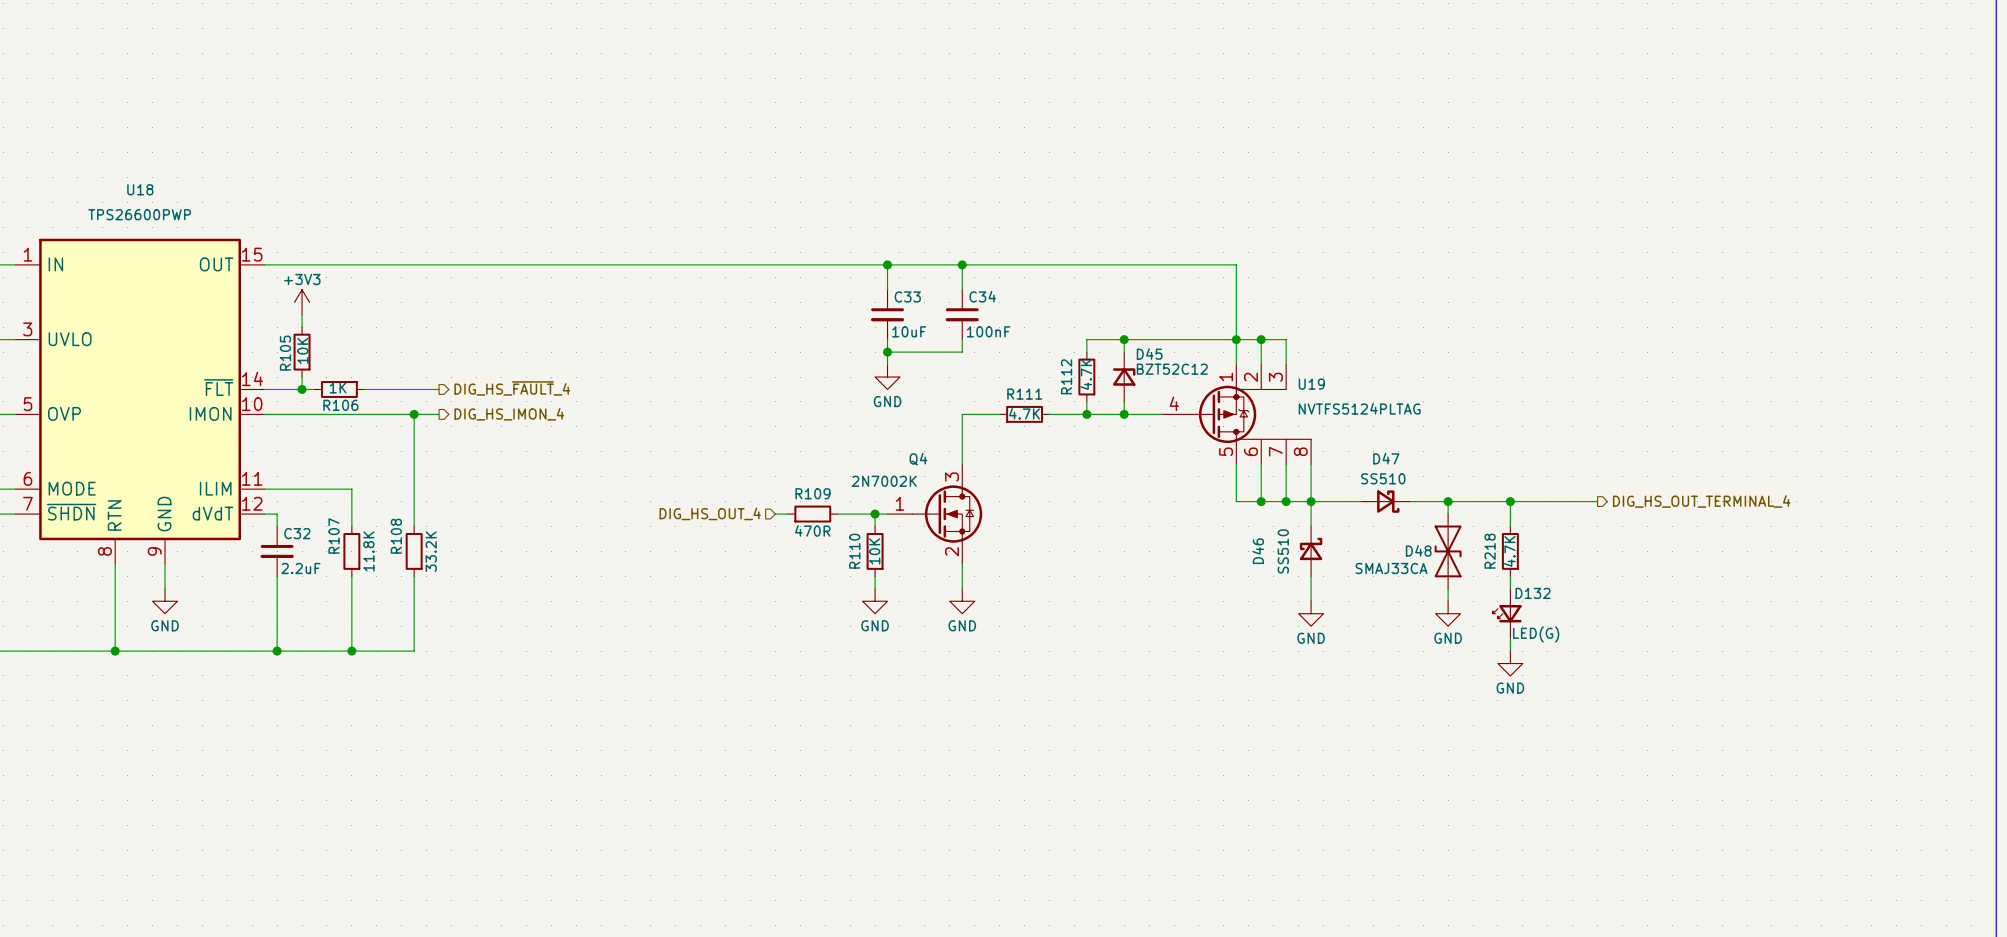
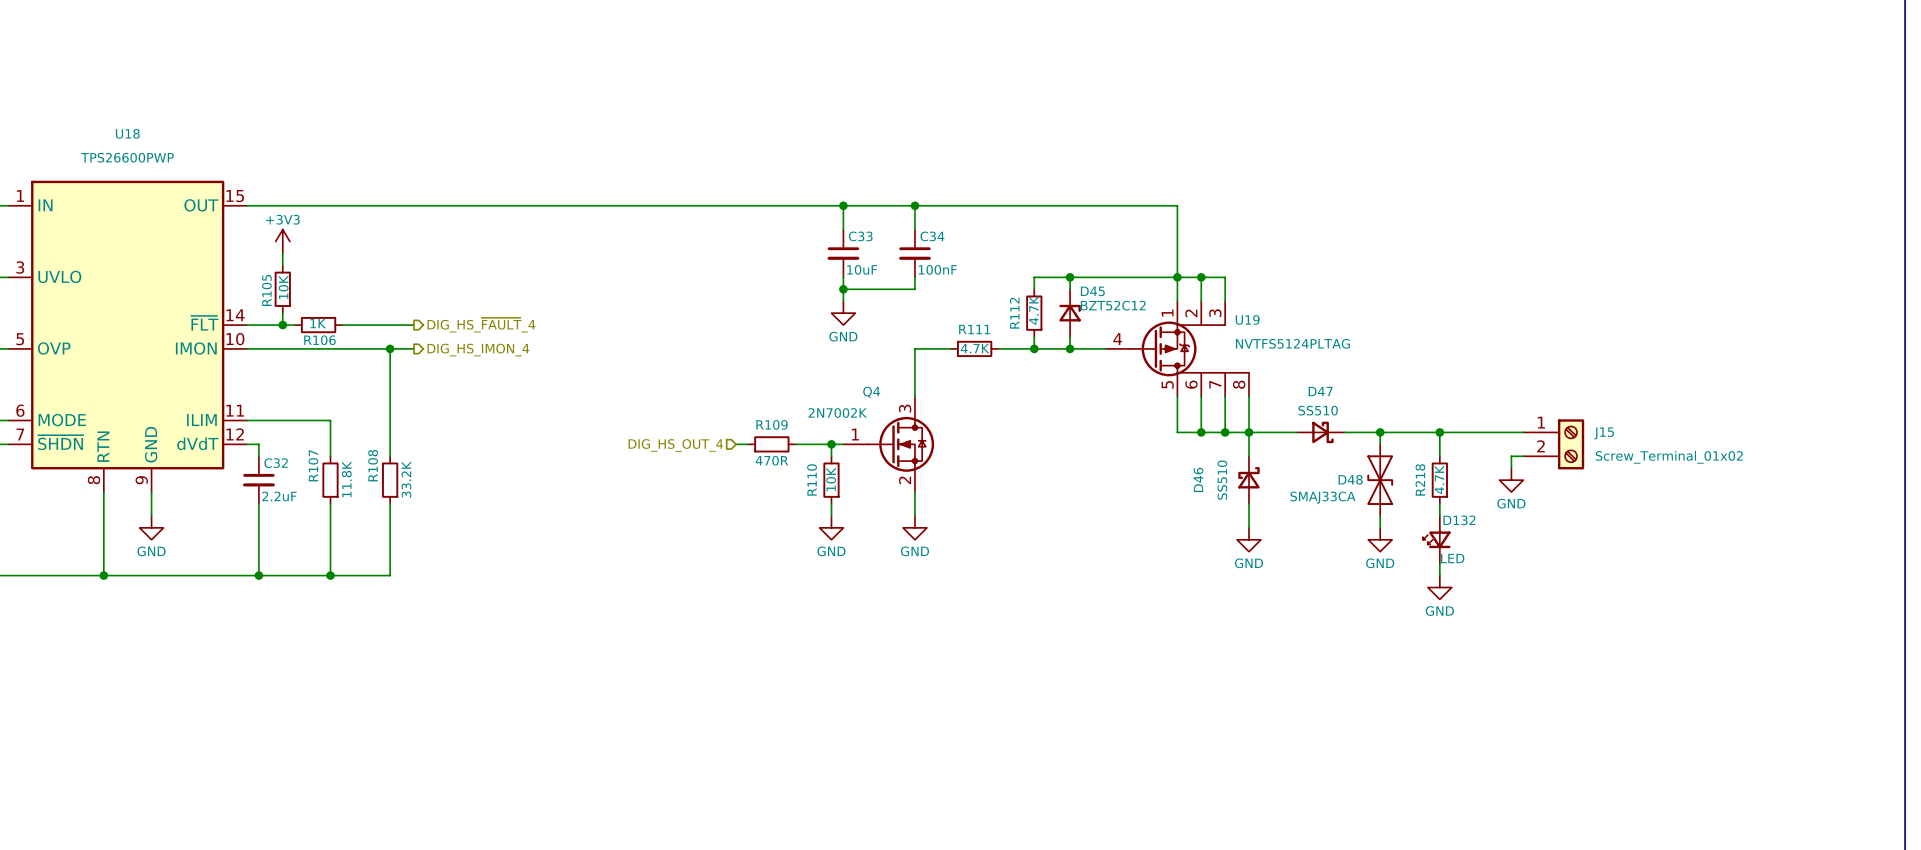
hierarchical label: DIG_HS_OUT_TERMINAL_4 (1701, 501) -> none
J15: none -> Screw_Terminal_01x02 (1553, 444)
wire: none -> (1523, 456) (1511, 456) (1511, 468)
power symbol: none -> GND (1511, 480)
D132 value: LED(G) (1536, 634) -> LED (1452, 558)

